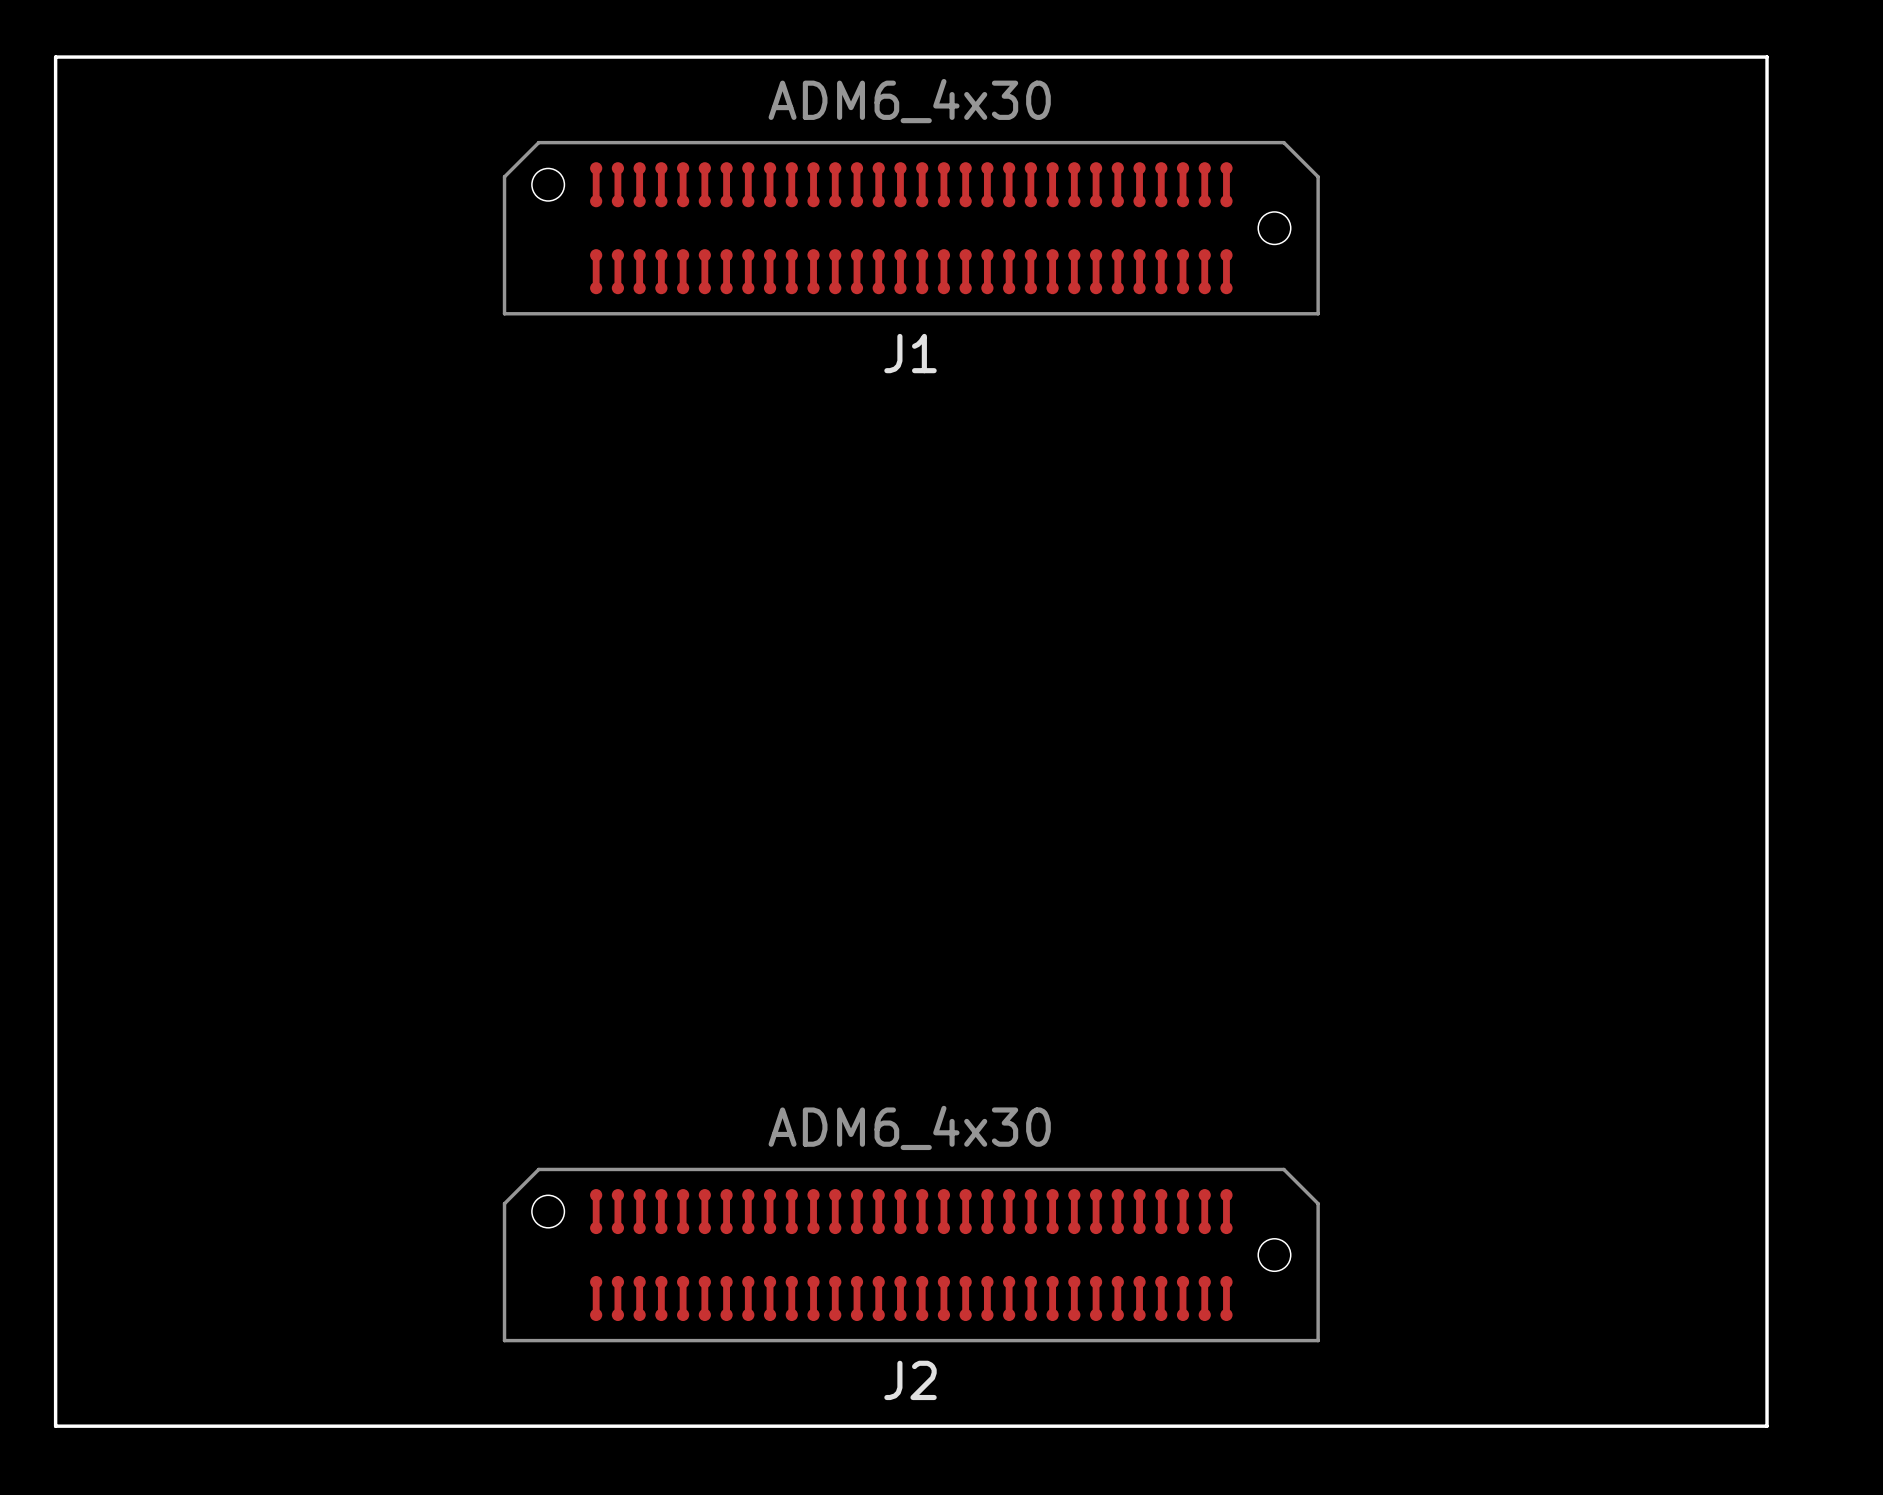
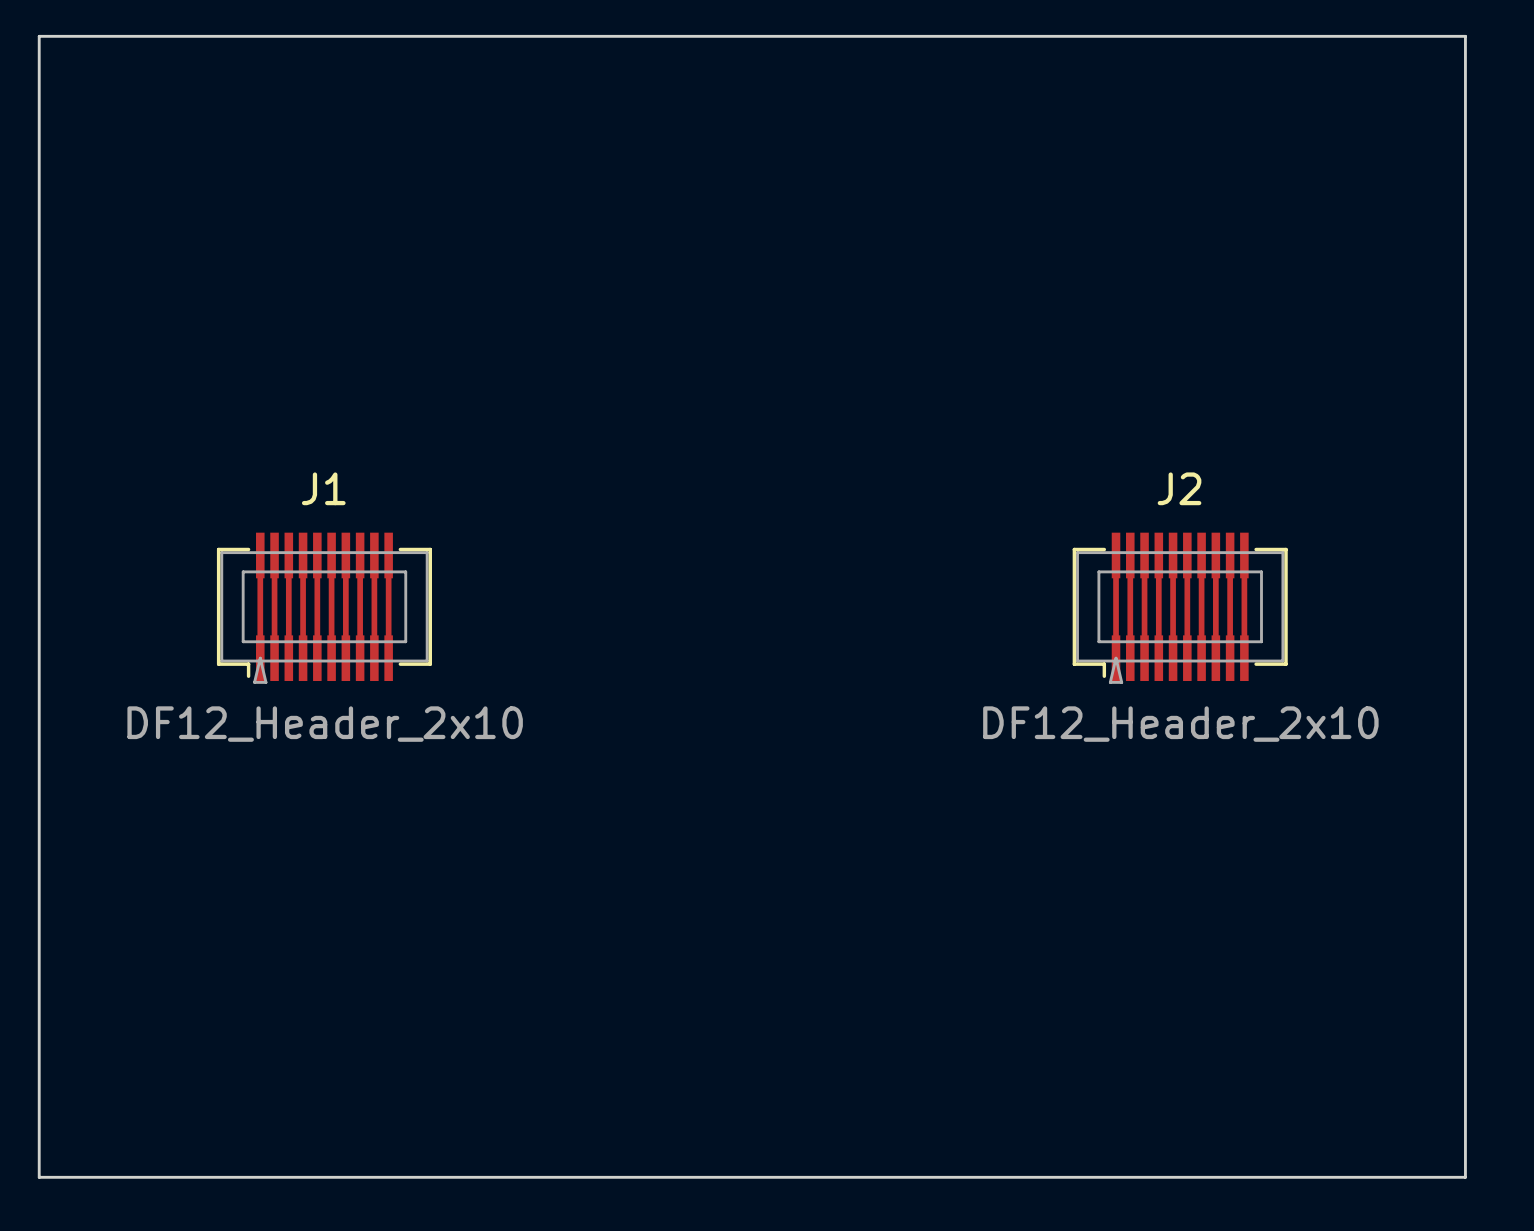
J1 value: ADM6_4x30 (909, 101) -> DF12_Header_2x10 (325, 724)
J1 footprint: [502, 140, 1320, 316] -> [216, 532, 433, 684]
track: (596, 168) (596, 201) -> none
track: (617, 168) (617, 201) -> none
track: (639, 168) (639, 201) -> none
track: (661, 168) (661, 201) -> none
track: (683, 168) (683, 201) -> none
track: (704, 168) (704, 201) -> none
track: (726, 168) (726, 201) -> none
track: (748, 168) (748, 201) -> none
track: (770, 168) (770, 201) -> none
track: (791, 168) (791, 201) -> none
track: (813, 168) (813, 201) -> none
track: (835, 168) (835, 201) -> none
track: (856, 168) (856, 201) -> none
track: (878, 168) (878, 201) -> none
track: (900, 168) (900, 201) -> none
track: (922, 168) (922, 201) -> none
track: (943, 168) (943, 201) -> none
track: (965, 168) (965, 201) -> none
track: (987, 168) (987, 201) -> none
track: (1009, 168) (1009, 201) -> none
track: (1030, 168) (1030, 201) -> none
track: (1052, 168) (1052, 201) -> none
track: (1074, 168) (1074, 201) -> none
track: (1096, 168) (1096, 201) -> none
track: (1117, 168) (1117, 201) -> none
track: (1139, 168) (1139, 201) -> none
track: (1161, 168) (1161, 201) -> none
track: (1183, 168) (1183, 201) -> none
track: (1204, 168) (1204, 201) -> none
track: (1226, 168) (1226, 201) -> none
track: (596, 255) (596, 288) -> none
track: (617, 255) (617, 288) -> none
track: (639, 255) (639, 288) -> none
track: (661, 255) (661, 288) -> none
track: (683, 255) (683, 288) -> none
track: (704, 255) (704, 288) -> none
track: (726, 255) (726, 288) -> none
track: (748, 255) (748, 288) -> none
track: (770, 255) (770, 288) -> none
track: (791, 255) (791, 288) -> none
track: (813, 255) (813, 288) -> none
track: (835, 255) (835, 288) -> none
track: (856, 255) (856, 288) -> none
track: (878, 255) (878, 288) -> none
track: (900, 255) (900, 288) -> none
track: (922, 255) (922, 288) -> none
track: (943, 255) (943, 288) -> none
track: (965, 255) (965, 288) -> none
track: (987, 255) (987, 288) -> none
track: (1009, 255) (1009, 288) -> none
track: (1030, 255) (1030, 288) -> none
track: (1052, 255) (1052, 288) -> none
track: (1074, 255) (1074, 288) -> none
track: (1096, 255) (1096, 288) -> none
track: (1117, 255) (1117, 288) -> none
track: (1139, 255) (1139, 288) -> none
track: (1161, 255) (1161, 288) -> none
track: (1183, 255) (1183, 288) -> none
track: (1204, 255) (1204, 288) -> none
track: (1226, 255) (1226, 288) -> none
J1 name position: J1 (910, 353) -> J1 (323, 488)
track: none -> (260, 555) (260, 658)
track: none -> (274, 555) (274, 658)
track: none -> (288, 555) (288, 658)
track: none -> (303, 555) (303, 658)
track: none -> (317, 555) (317, 658)
track: none -> (331, 555) (331, 658)
track: none -> (345, 555) (345, 658)
track: none -> (360, 555) (360, 658)
track: none -> (374, 555) (374, 658)
track: none -> (388, 555) (388, 658)
track: none -> (1116, 555) (1116, 658)
track: none -> (1130, 555) (1130, 658)
track: none -> (1144, 555) (1144, 658)
track: none -> (1158, 555) (1158, 658)
track: none -> (1173, 555) (1173, 658)
track: none -> (1187, 555) (1187, 658)
track: none -> (1201, 555) (1201, 658)
track: none -> (1215, 555) (1215, 658)
track: none -> (1230, 555) (1230, 658)
track: none -> (1244, 555) (1244, 658)
J2 value: ADM6_4x30 (909, 1127) -> DF12_Header_2x10 (1180, 724)
J2 footprint: [502, 1167, 1320, 1343] -> [1072, 532, 1288, 684]
track: (596, 1195) (596, 1227) -> none
track: (617, 1195) (617, 1227) -> none
track: (639, 1195) (639, 1227) -> none
track: (661, 1195) (661, 1227) -> none
track: (683, 1195) (683, 1227) -> none
track: (704, 1195) (704, 1227) -> none
track: (726, 1195) (726, 1227) -> none
track: (748, 1195) (748, 1227) -> none
track: (770, 1195) (770, 1227) -> none
track: (791, 1195) (791, 1227) -> none
track: (813, 1195) (813, 1227) -> none
track: (835, 1195) (835, 1227) -> none
track: (856, 1195) (856, 1227) -> none
track: (878, 1195) (878, 1227) -> none
track: (900, 1195) (900, 1227) -> none
track: (922, 1195) (922, 1227) -> none
track: (943, 1195) (943, 1227) -> none
track: (965, 1195) (965, 1227) -> none
track: (987, 1195) (987, 1227) -> none
track: (1009, 1195) (1009, 1227) -> none
track: (1030, 1195) (1030, 1227) -> none
track: (1052, 1195) (1052, 1227) -> none
track: (1074, 1195) (1074, 1227) -> none
track: (1096, 1195) (1096, 1227) -> none
track: (1117, 1195) (1117, 1227) -> none
track: (1139, 1195) (1139, 1227) -> none
track: (1161, 1195) (1161, 1227) -> none
track: (1183, 1195) (1183, 1227) -> none
track: (1204, 1195) (1204, 1227) -> none
track: (1226, 1195) (1226, 1227) -> none
track: (596, 1282) (596, 1314) -> none
track: (617, 1282) (617, 1314) -> none
track: (639, 1282) (639, 1314) -> none
track: (661, 1282) (661, 1314) -> none
track: (683, 1282) (683, 1314) -> none
track: (704, 1282) (704, 1314) -> none
track: (726, 1282) (726, 1314) -> none
track: (748, 1282) (748, 1314) -> none
track: (770, 1282) (770, 1314) -> none
track: (791, 1282) (791, 1314) -> none
track: (813, 1282) (813, 1314) -> none
track: (835, 1282) (835, 1314) -> none
track: (856, 1282) (856, 1314) -> none
track: (878, 1282) (878, 1314) -> none
track: (900, 1282) (900, 1314) -> none
track: (922, 1282) (922, 1314) -> none
track: (943, 1282) (943, 1314) -> none
track: (965, 1282) (965, 1314) -> none
track: (987, 1282) (987, 1314) -> none
track: (1009, 1282) (1009, 1314) -> none
track: (1030, 1282) (1030, 1314) -> none
track: (1052, 1282) (1052, 1314) -> none
track: (1074, 1282) (1074, 1314) -> none
track: (1096, 1282) (1096, 1314) -> none
track: (1117, 1282) (1117, 1314) -> none
track: (1139, 1282) (1139, 1314) -> none
track: (1161, 1282) (1161, 1314) -> none
track: (1183, 1282) (1183, 1314) -> none
track: (1204, 1282) (1204, 1314) -> none
track: (1226, 1282) (1226, 1314) -> none
J2 name position: J2 (910, 1380) -> J2 (1179, 488)

